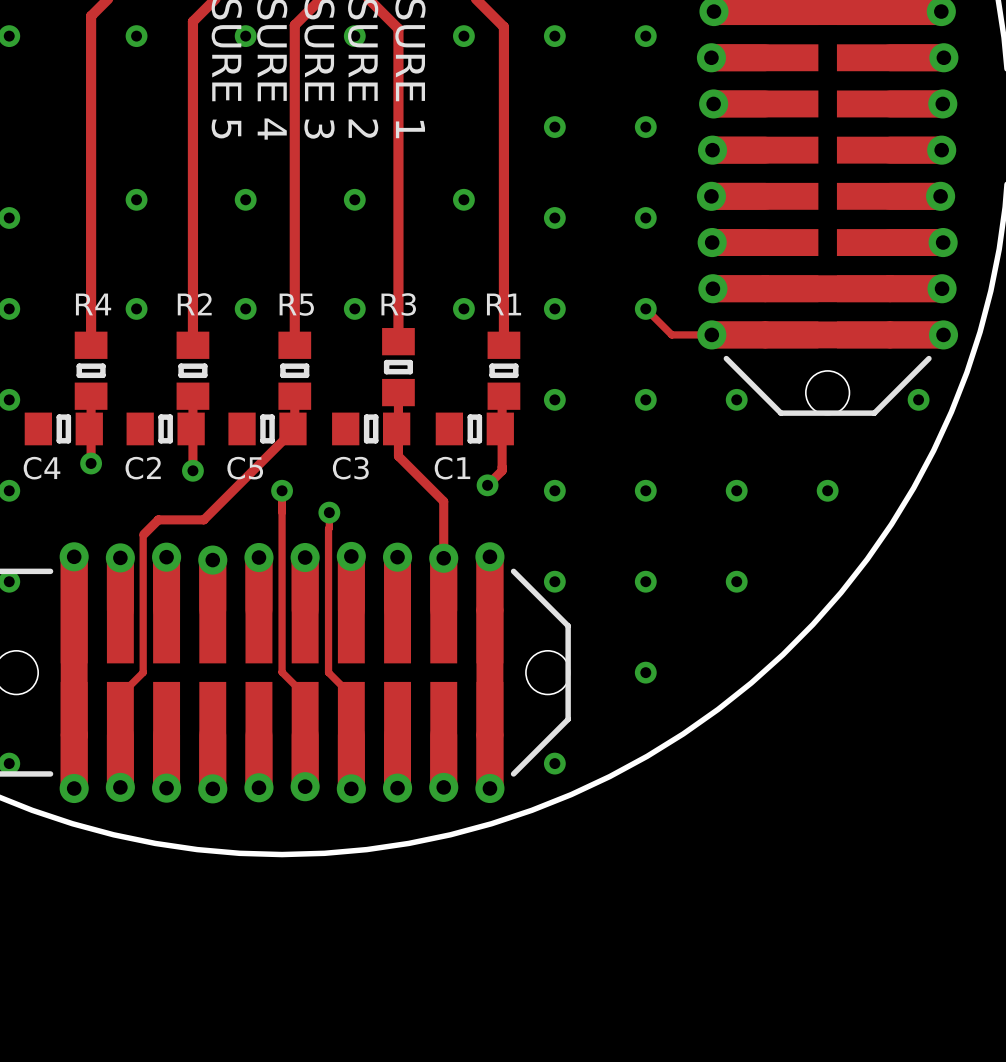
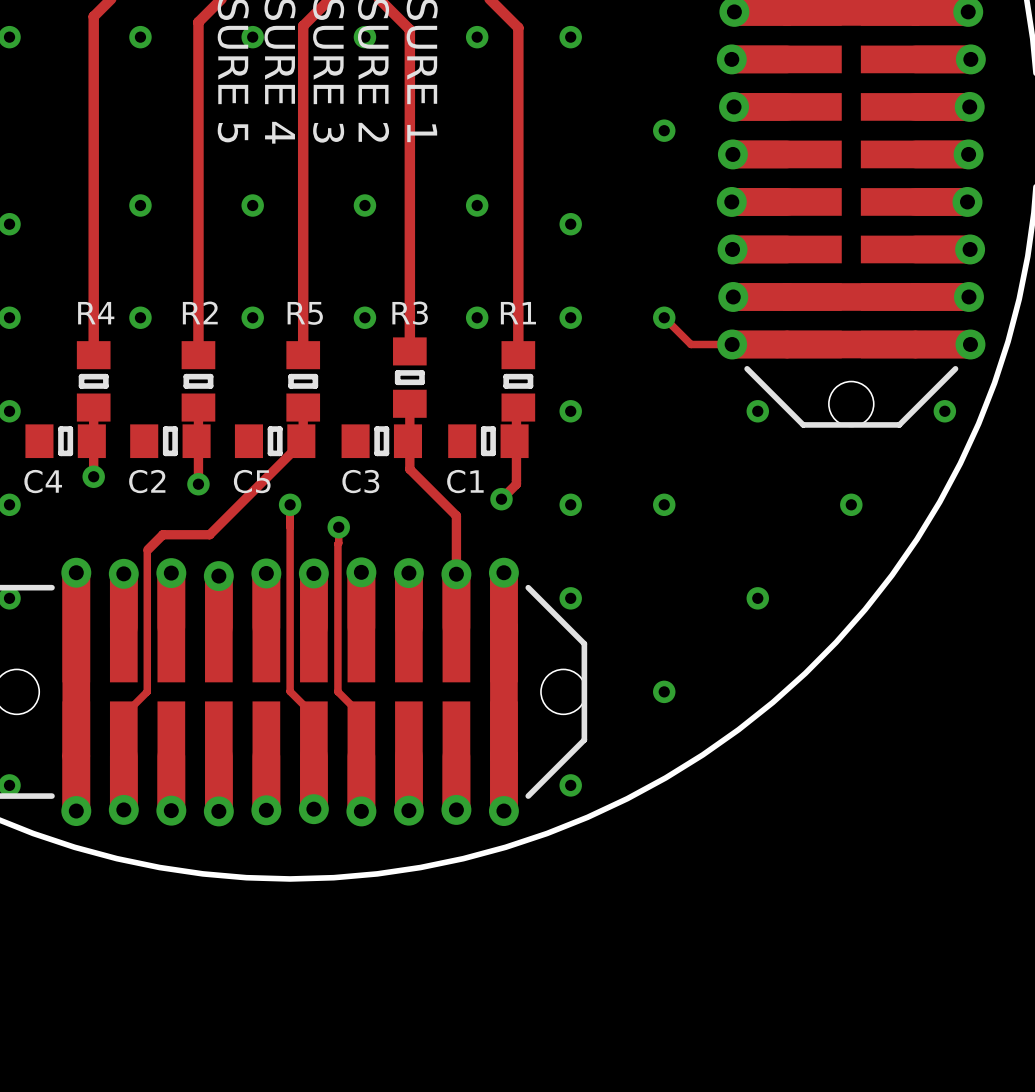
via: (645, 36) -> none
via: (554, 127) -> none
via: (645, 217) -> none
via: (645, 399) -> none
via: (736, 490) -> none
via: (645, 581) -> none

